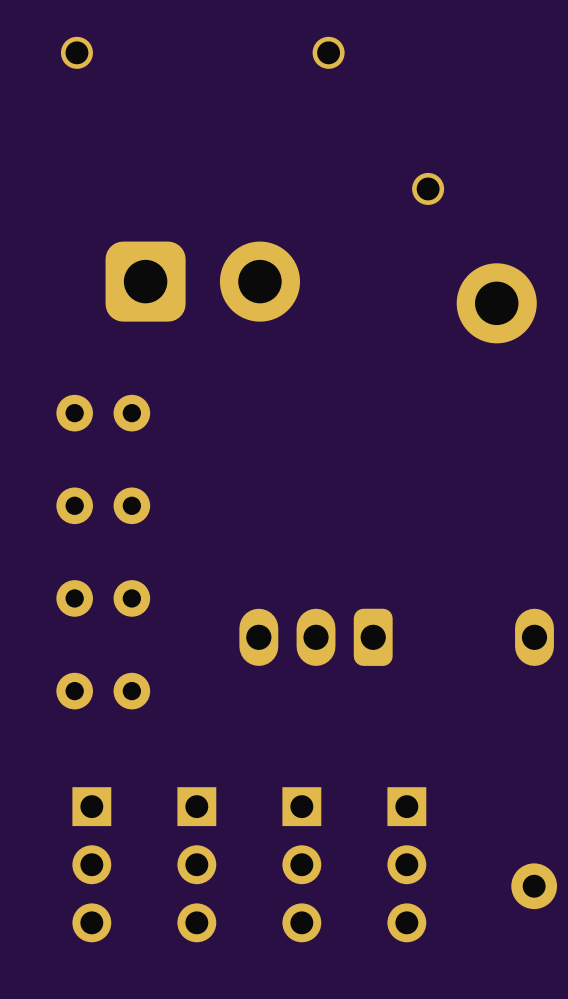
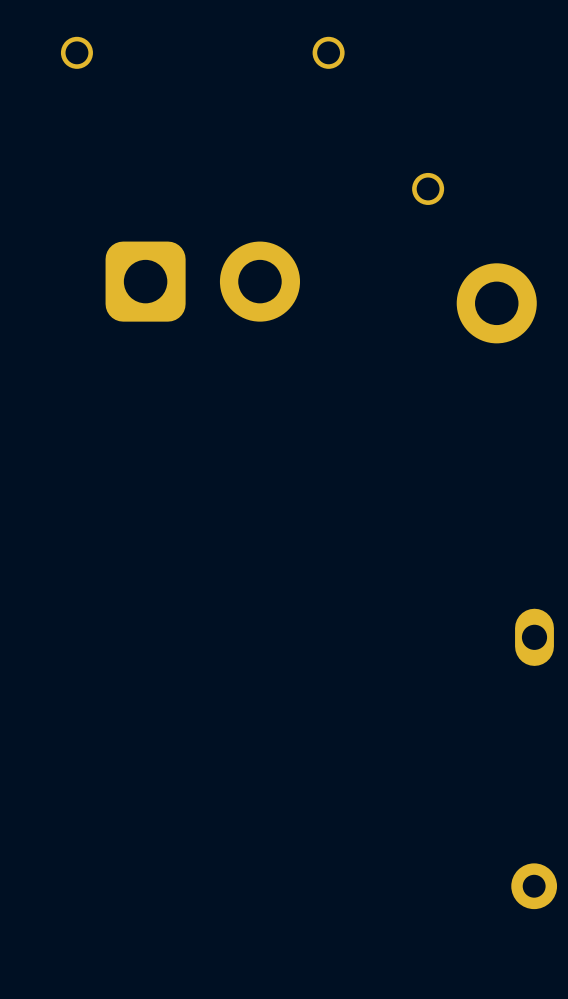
part: (103, 413) -> none
part: (103, 505) -> none
part: (103, 598) -> none
part: (316, 637) -> none
part: (103, 691) -> none
part: (91, 864) -> none
part: (196, 864) -> none
part: (301, 864) -> none
part: (406, 864) -> none

